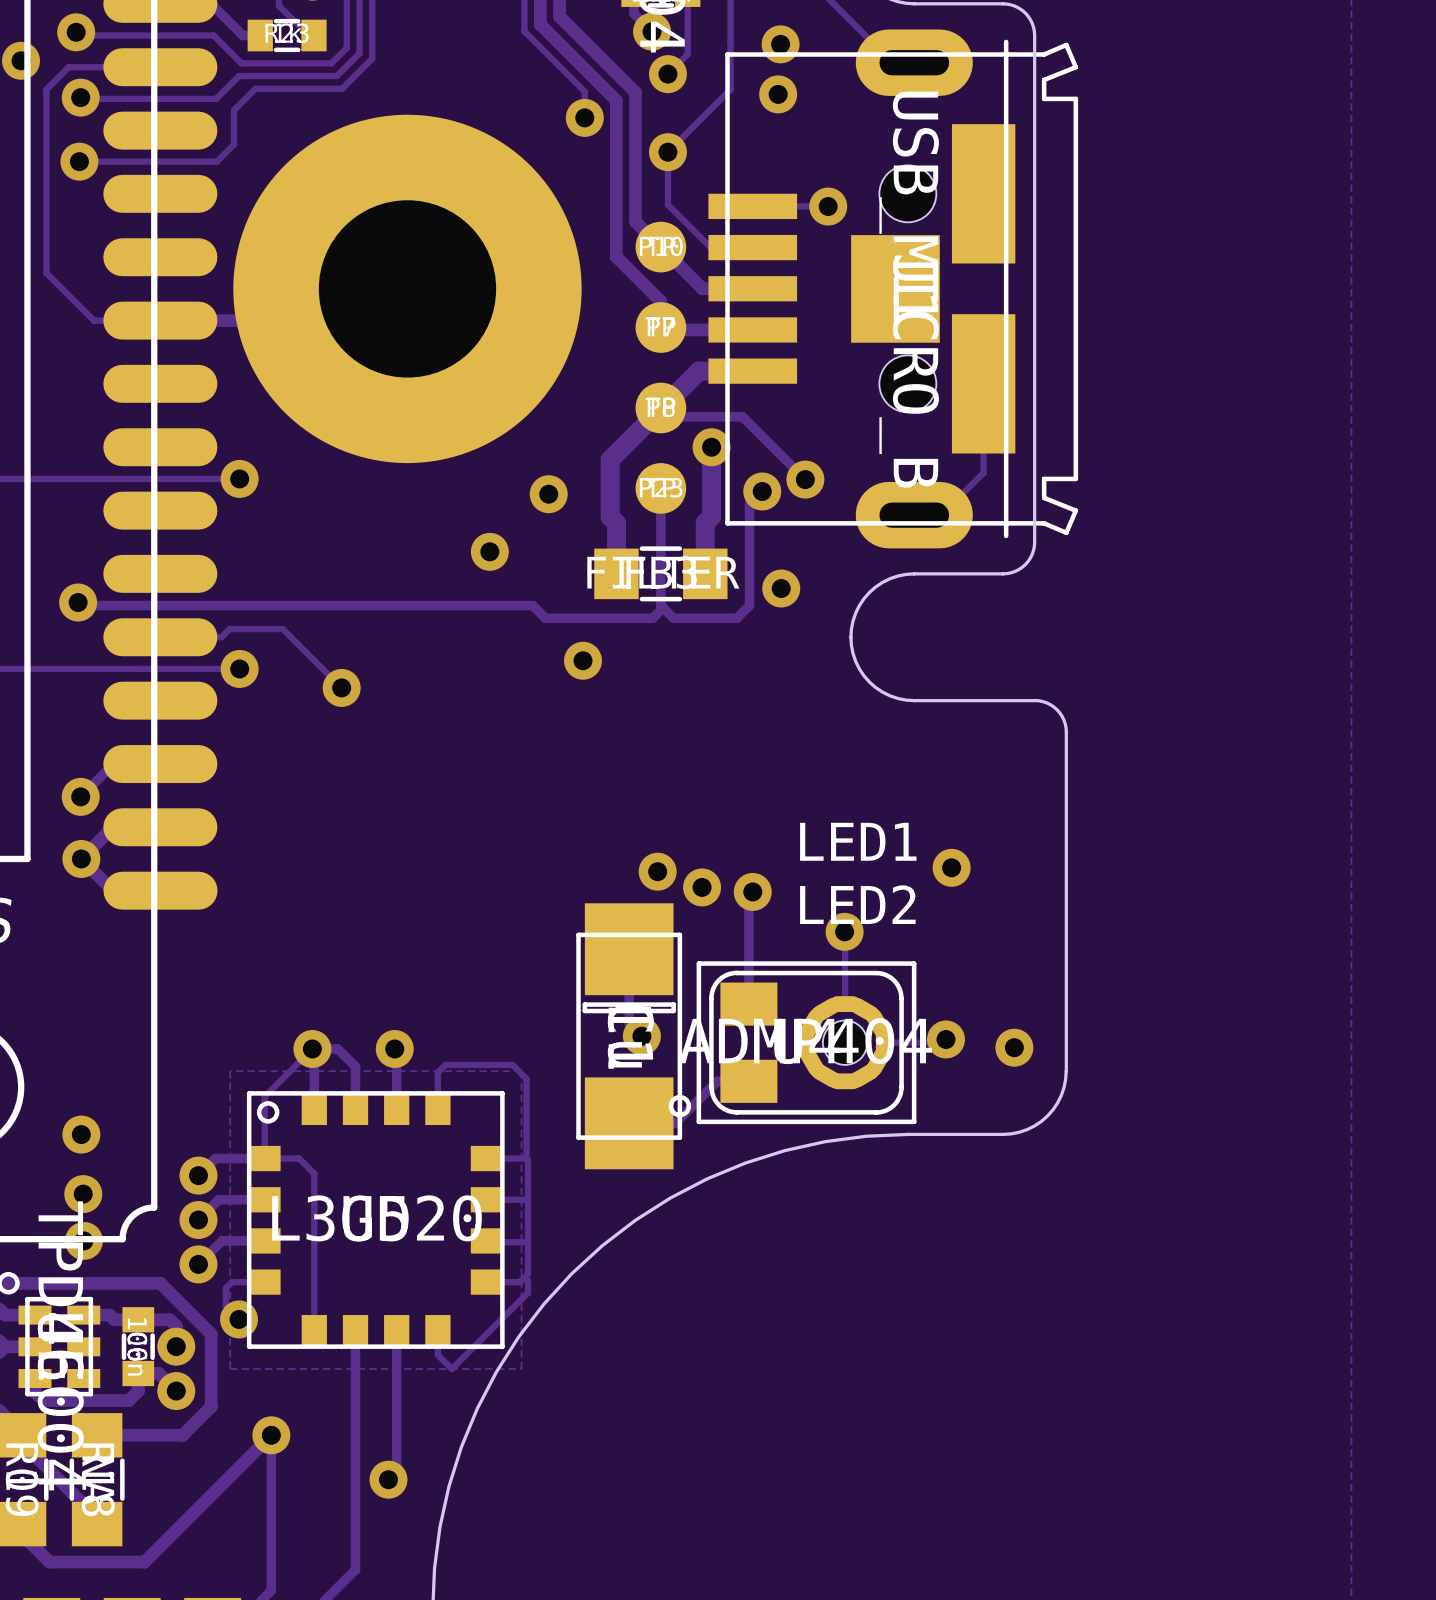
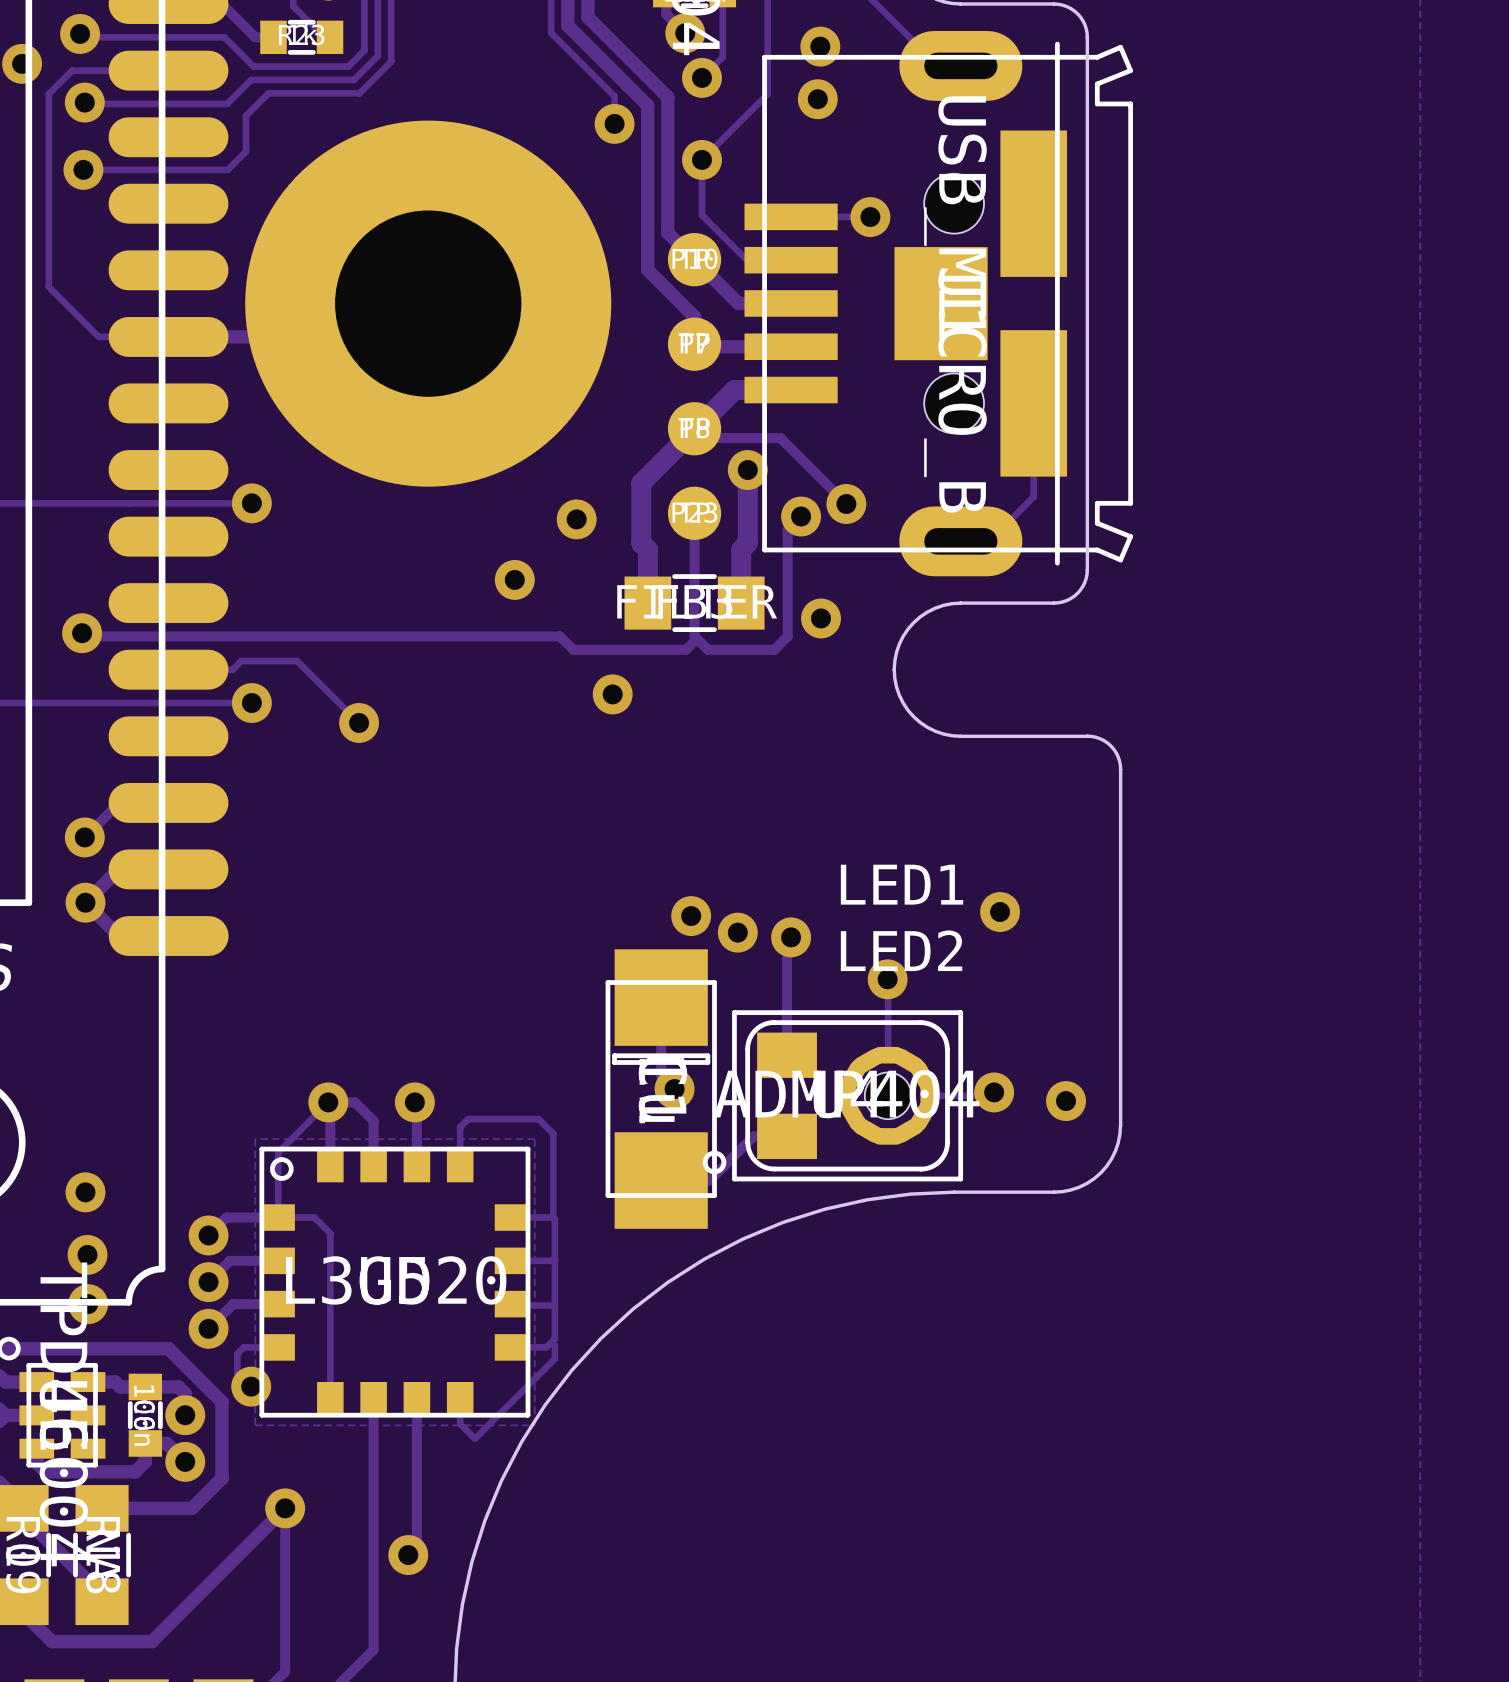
zone outline: (521, 1071) (521, 1369) (230, 1369) (230, 1071) (521, 1071) -> (534, 1139) (534, 1425) (255, 1425) (255, 1139) (534, 1139)

